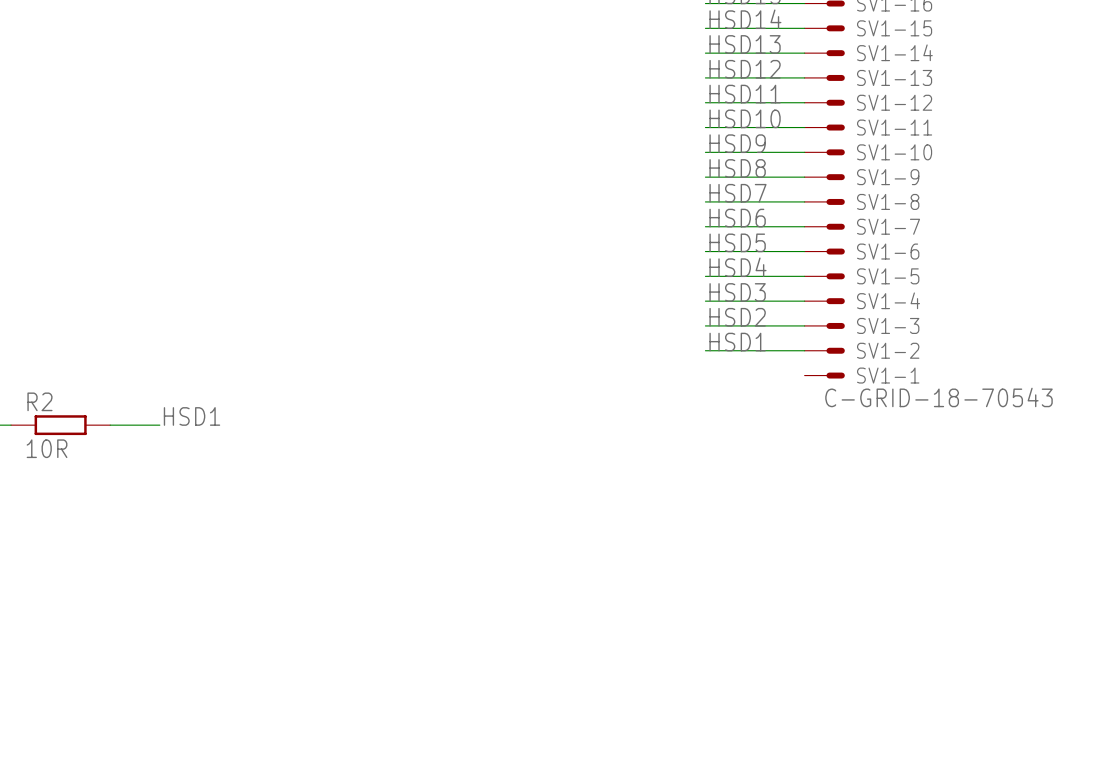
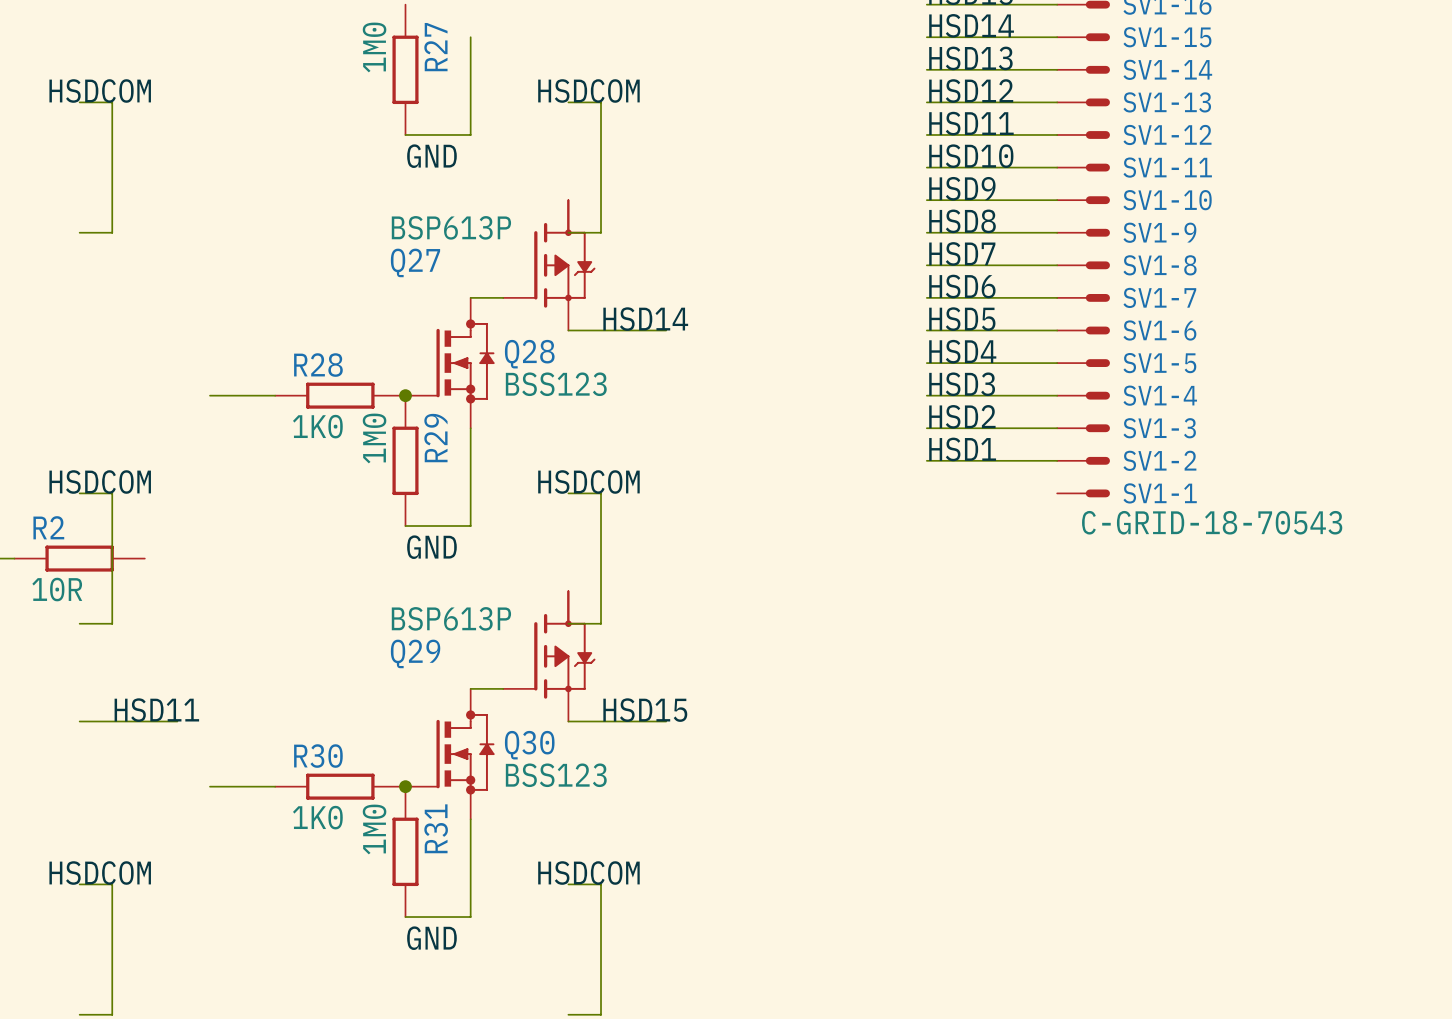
wire: none -> (470, 37) (470, 134) (405, 134)
R27: none -> 1M0 (405, 69)
label: none -> HSDCOM (100, 91)
label: none -> HSDCOM (588, 91)
wire: none -> (79, 102) (112, 102) (112, 232) (79, 232)
wire: none -> (568, 102) (601, 102) (601, 232) (568, 232)
label: none -> GND (431, 156)
Q27: none -> BSP613P (549, 265)
wire: none -> (470, 297) (503, 297)
label: none -> HSD14 (645, 319)
wire: none -> (568, 330) (666, 330)
Q28: none -> BSS123 (449, 363)
R28: none -> 1K0 (340, 395)
junction: none -> (405, 395)
wire: none -> (470, 428) (470, 525) (405, 525)
R29: none -> 1M0 (405, 460)
label: none -> HSDCOM (100, 482)
label: none -> HSDCOM (588, 482)
wire: none -> (79, 493) (112, 493) (112, 623) (79, 623)
wire: none -> (568, 493) (601, 493) (601, 623) (568, 623)
label: HSD1 (191, 416) -> none
label: none -> GND (431, 547)
wire: (110, 425) (159, 425) -> (209, 395) (275, 395)
Q29: none -> BSP613P (549, 656)
wire: none -> (470, 688) (503, 688)
label: none -> HSD11 (156, 710)
label: none -> HSD15 (645, 710)
wire: none -> (79, 721) (177, 721)
wire: none -> (568, 721) (666, 721)
Q30: none -> BSS123 (449, 754)
wire: none -> (209, 786) (275, 786)
R30: none -> 1K0 (340, 786)
junction: none -> (405, 786)
wire: none -> (470, 819) (470, 917) (405, 917)
R31: none -> 1M0 (405, 851)
label: none -> HSDCOM (100, 873)
label: none -> HSDCOM (588, 873)
wire: none -> (79, 884) (112, 884) (112, 1014) (79, 1014)
wire: none -> (568, 884) (601, 884) (601, 1014) (568, 1014)
label: none -> GND (431, 938)

